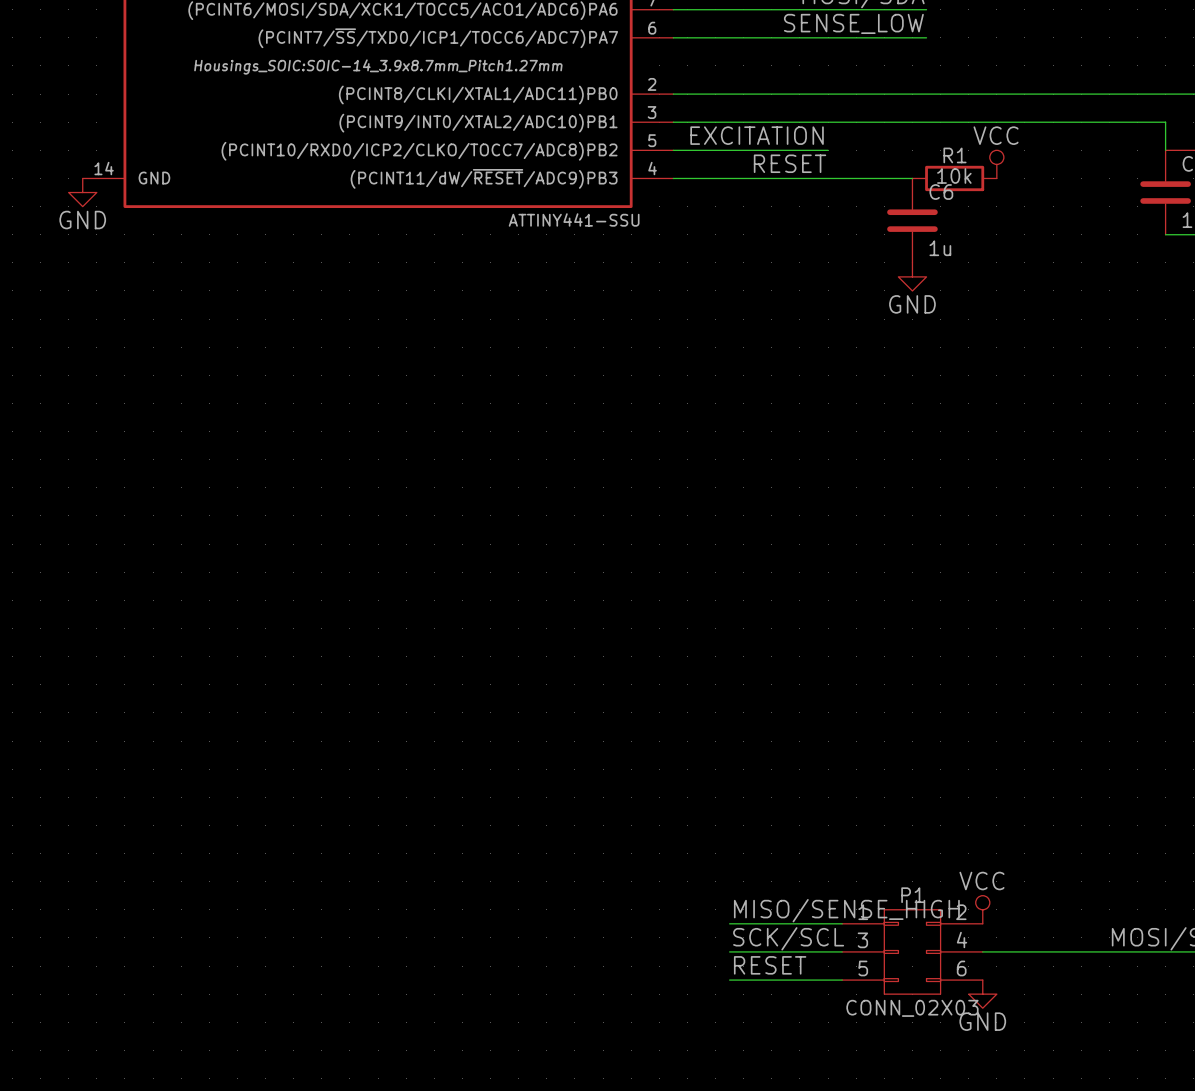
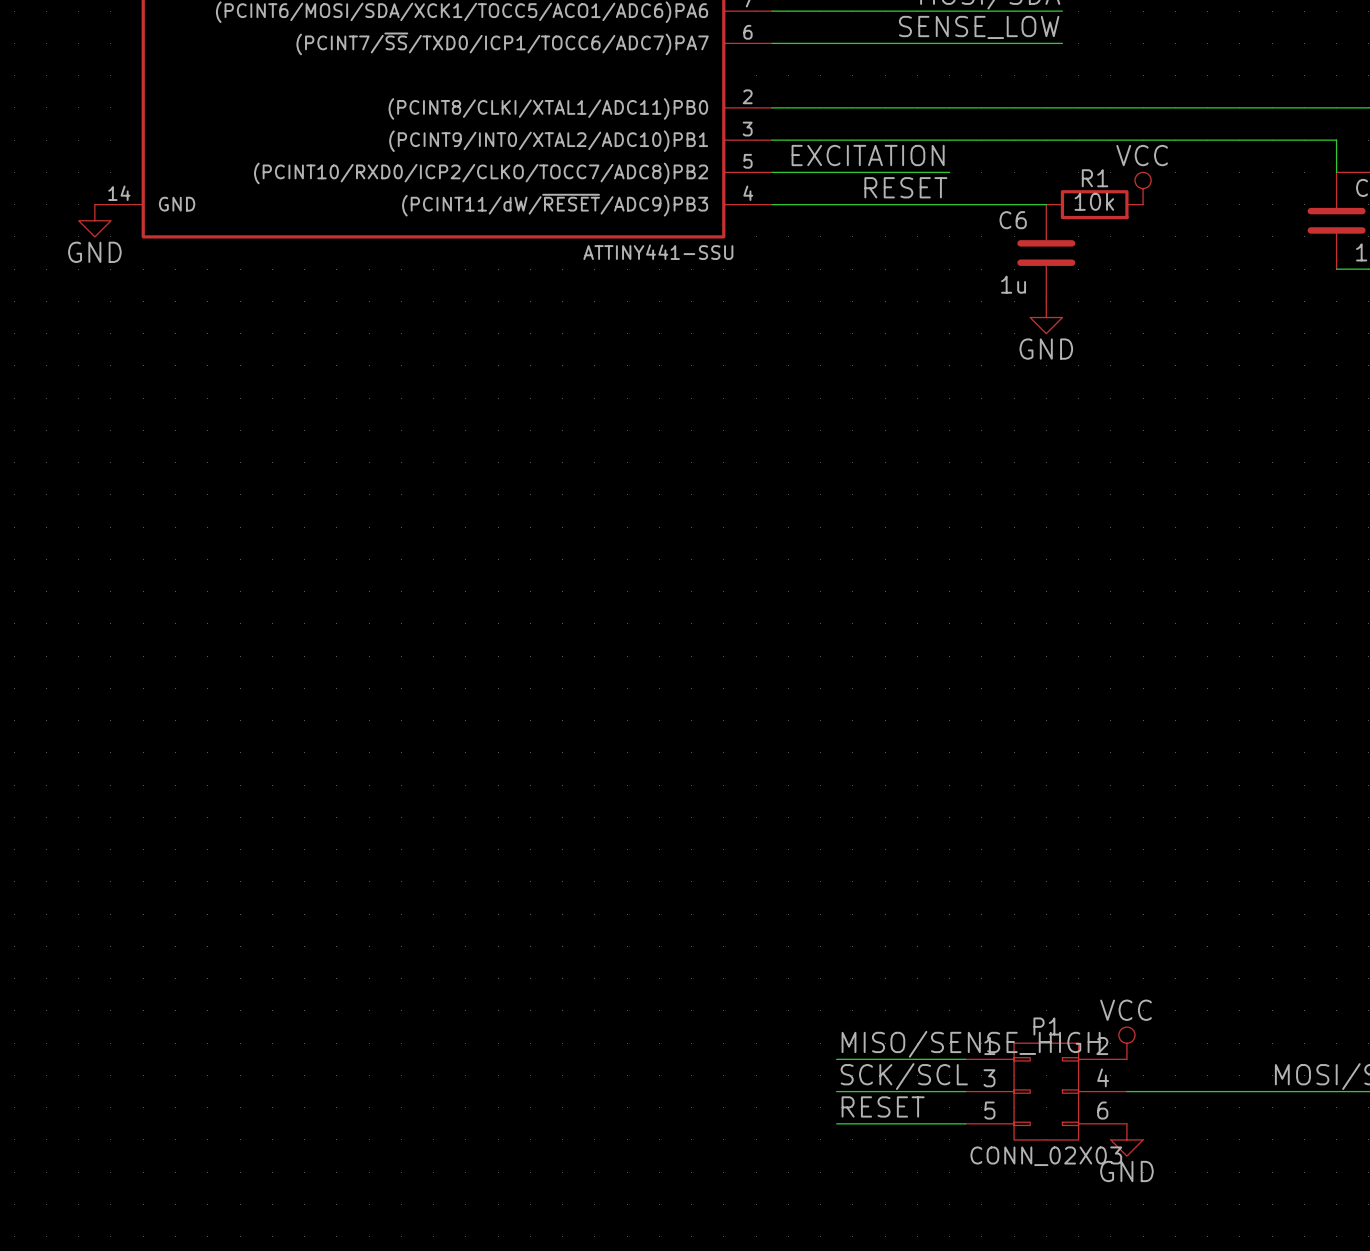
part text: Housings_SOIC:SOIC-14_3.9x8.7mm_Pitch1.27mm (378, 67) -> none
C6 name position: C6 (941, 192) -> C6 (1013, 220)
C6 value position: 1u (940, 248) -> 1u (1013, 284)

